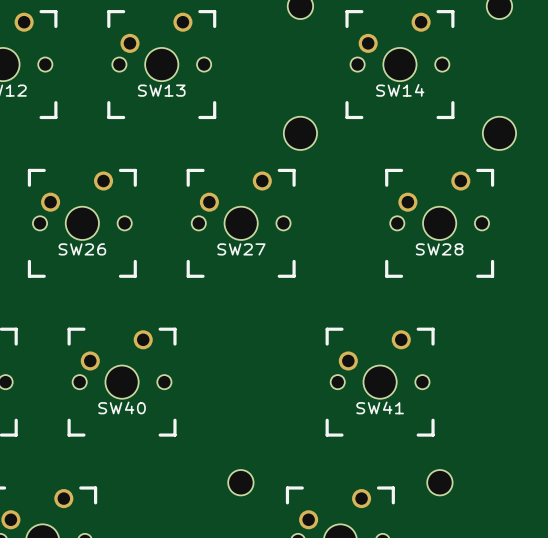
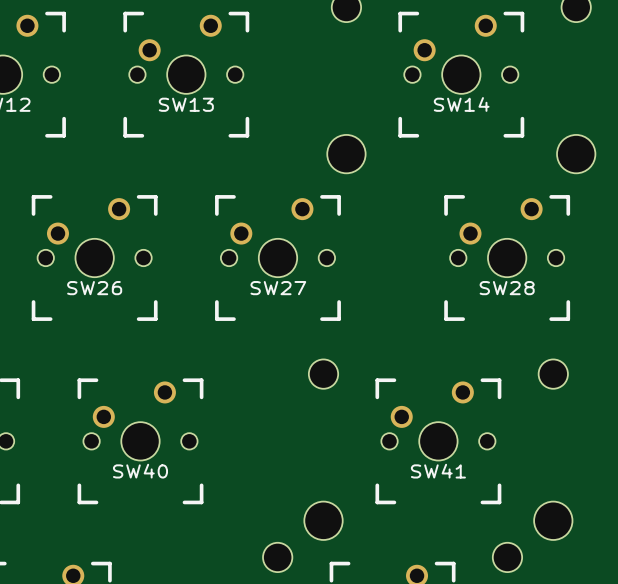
SW41 footprint: [325, 327, 435, 437] -> [304, 359, 573, 540]

